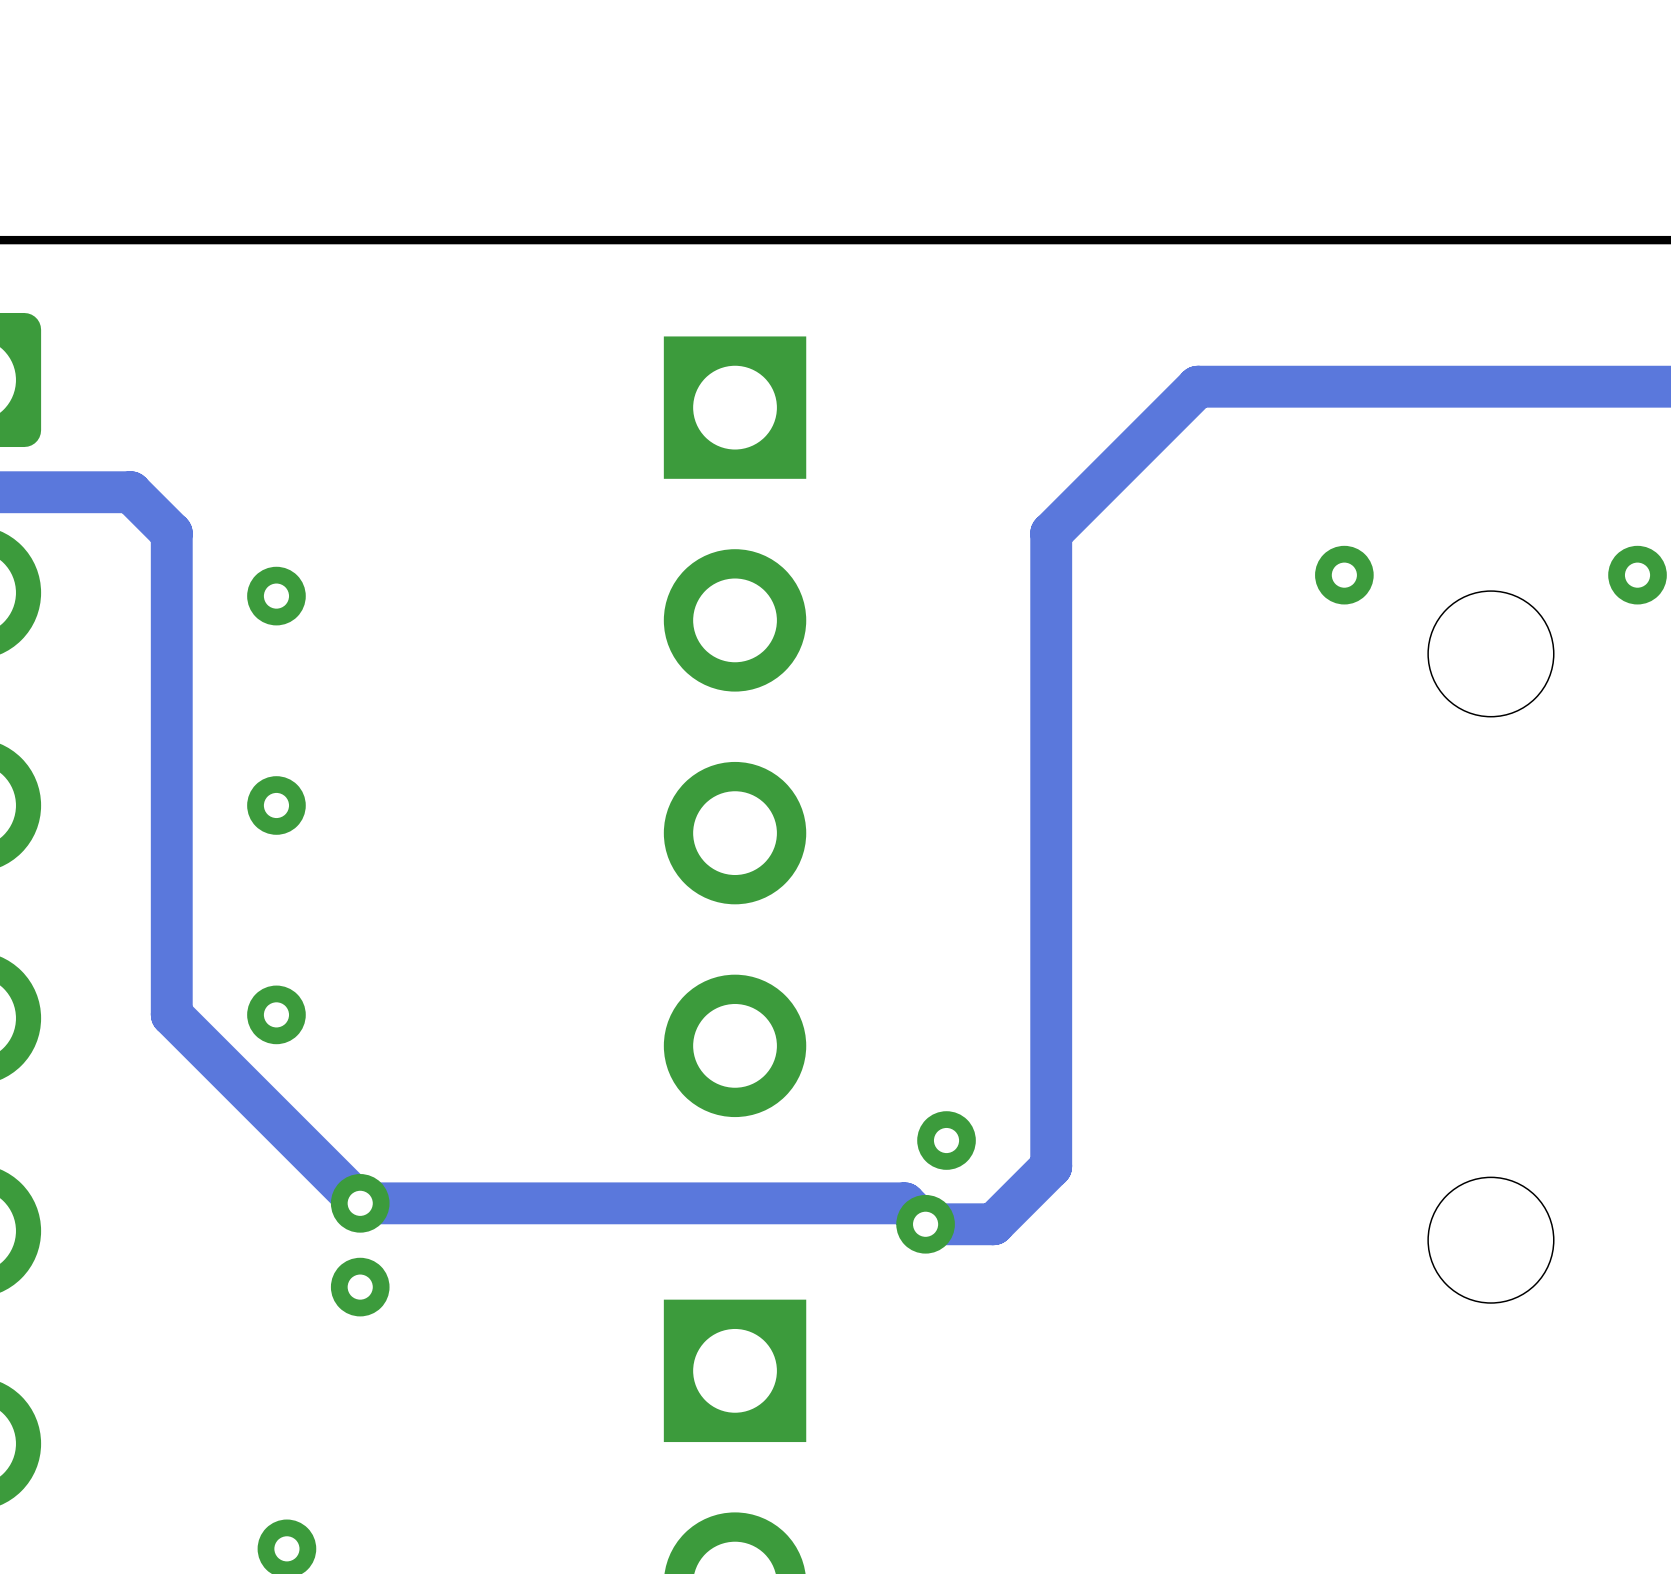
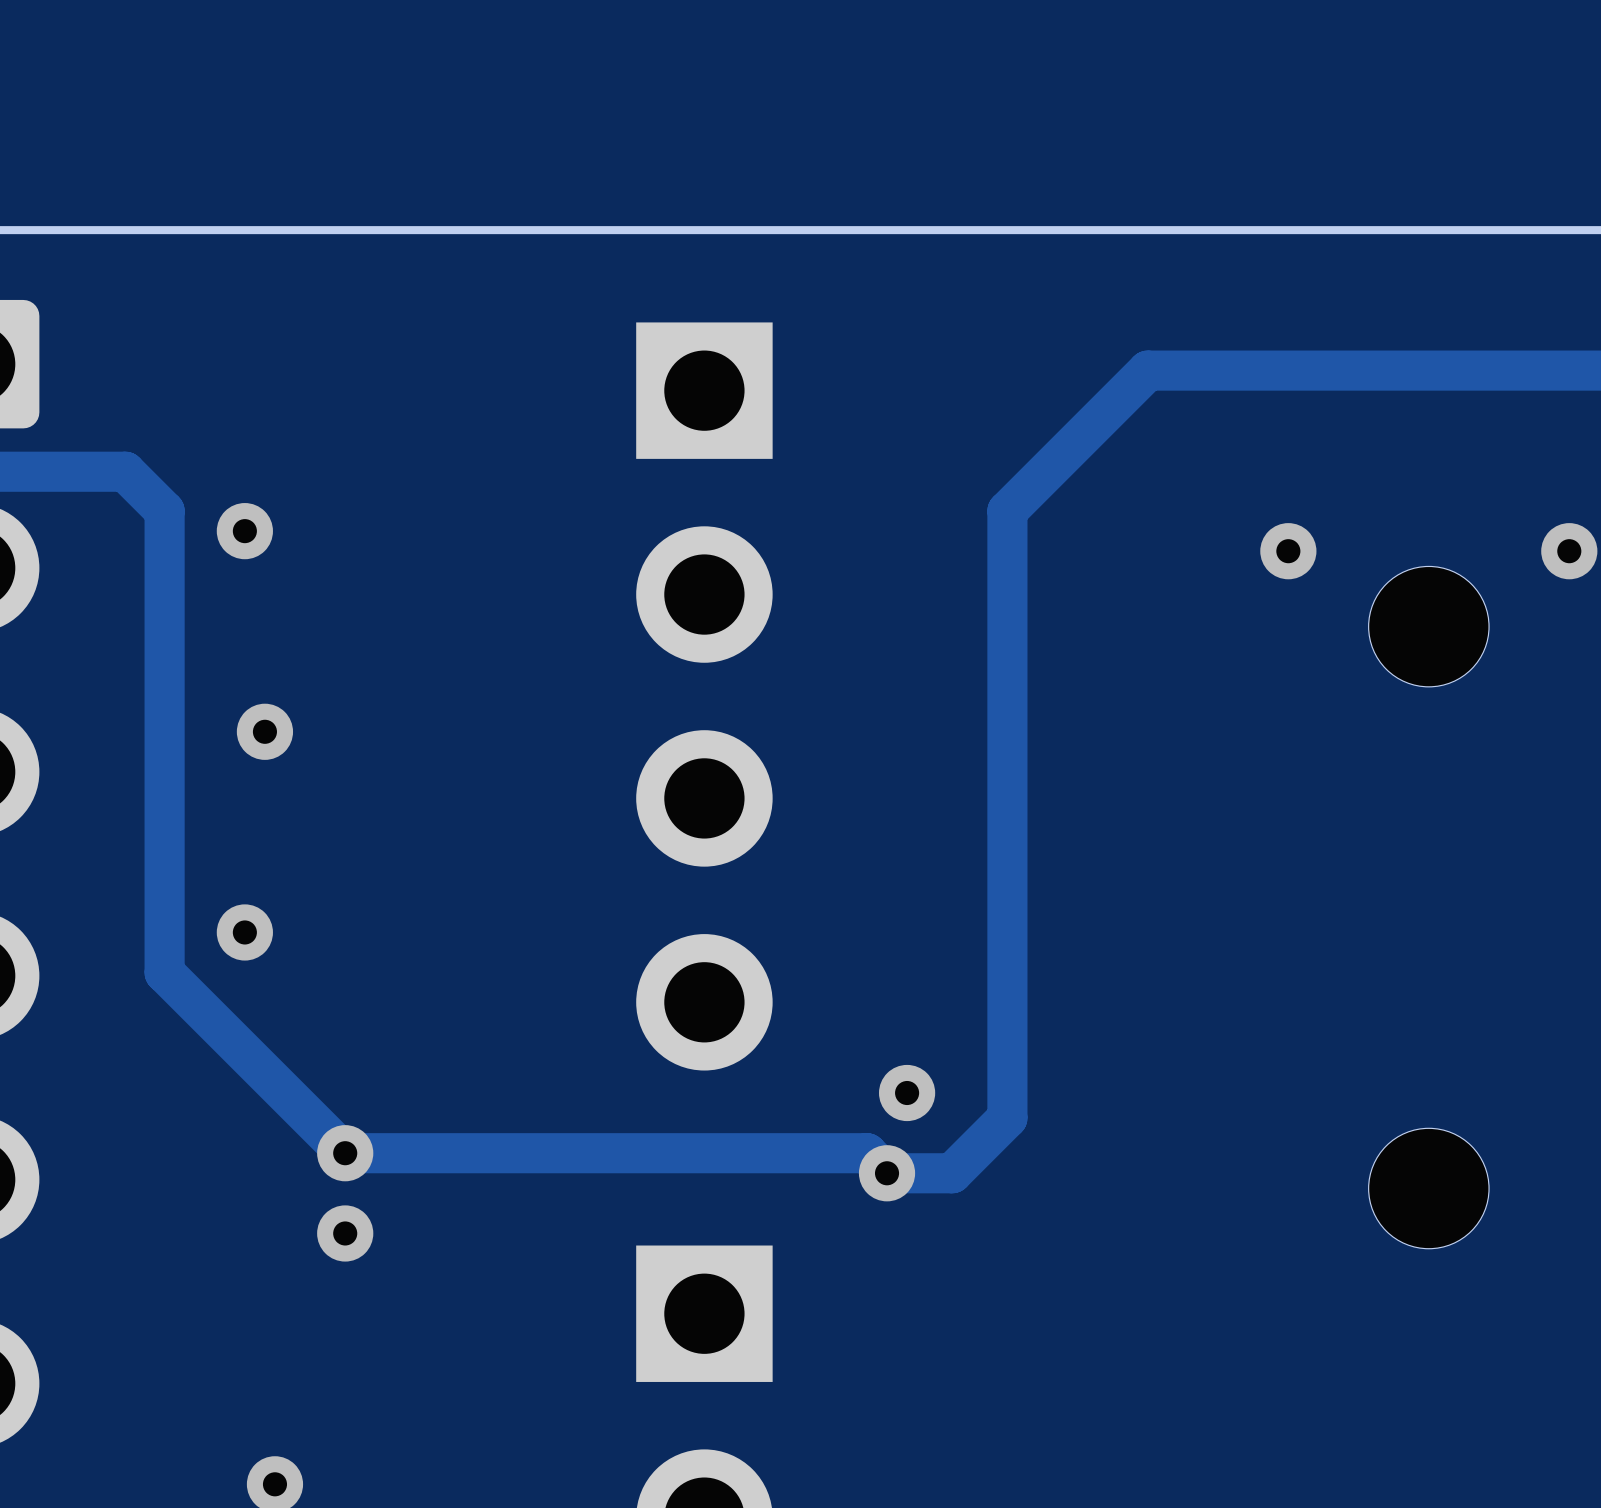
via position: (276, 596) -> (244, 531)
via position: (276, 805) -> (264, 731)
via position: (276, 1014) -> (244, 932)

